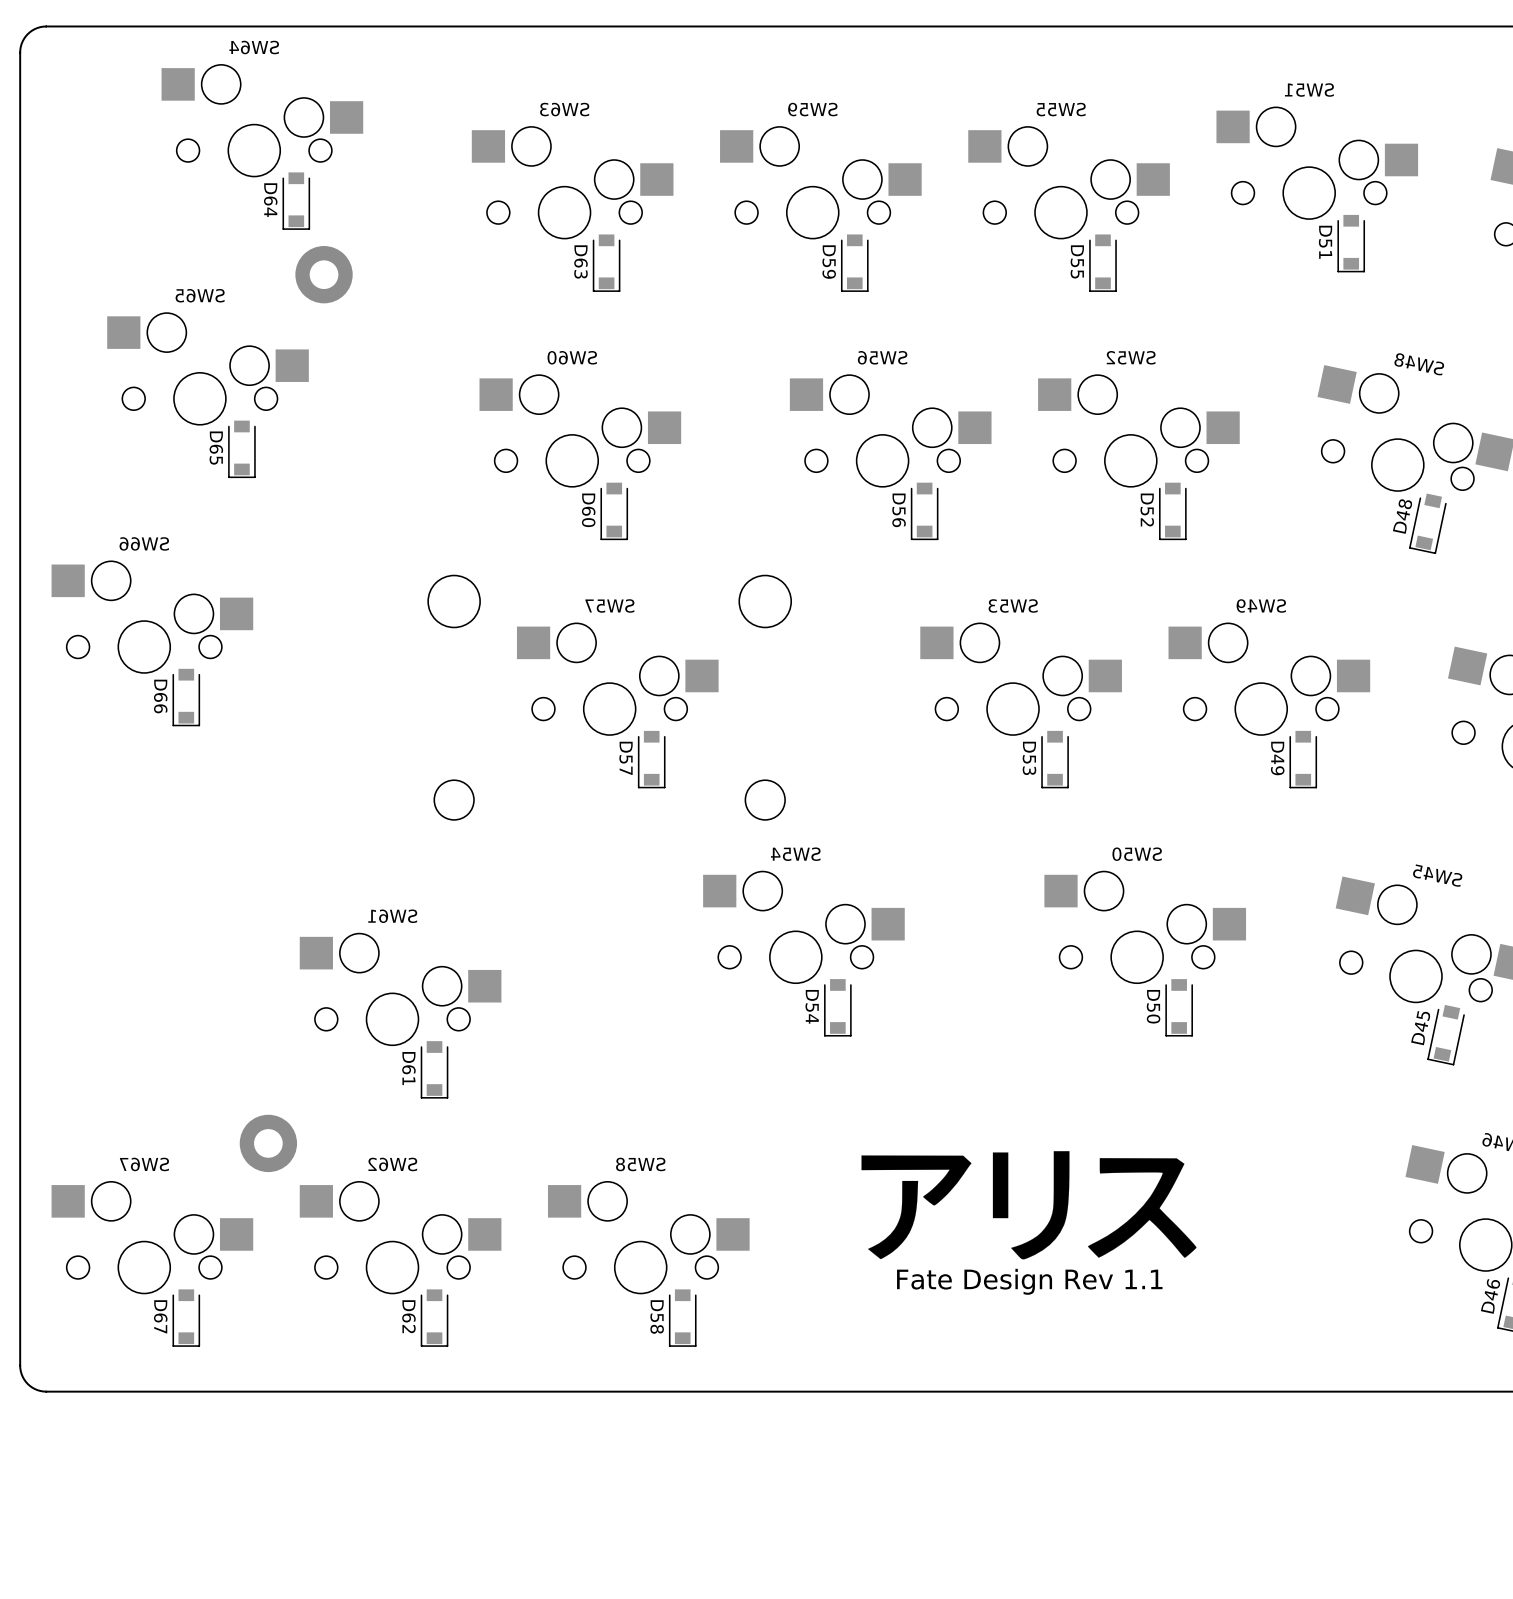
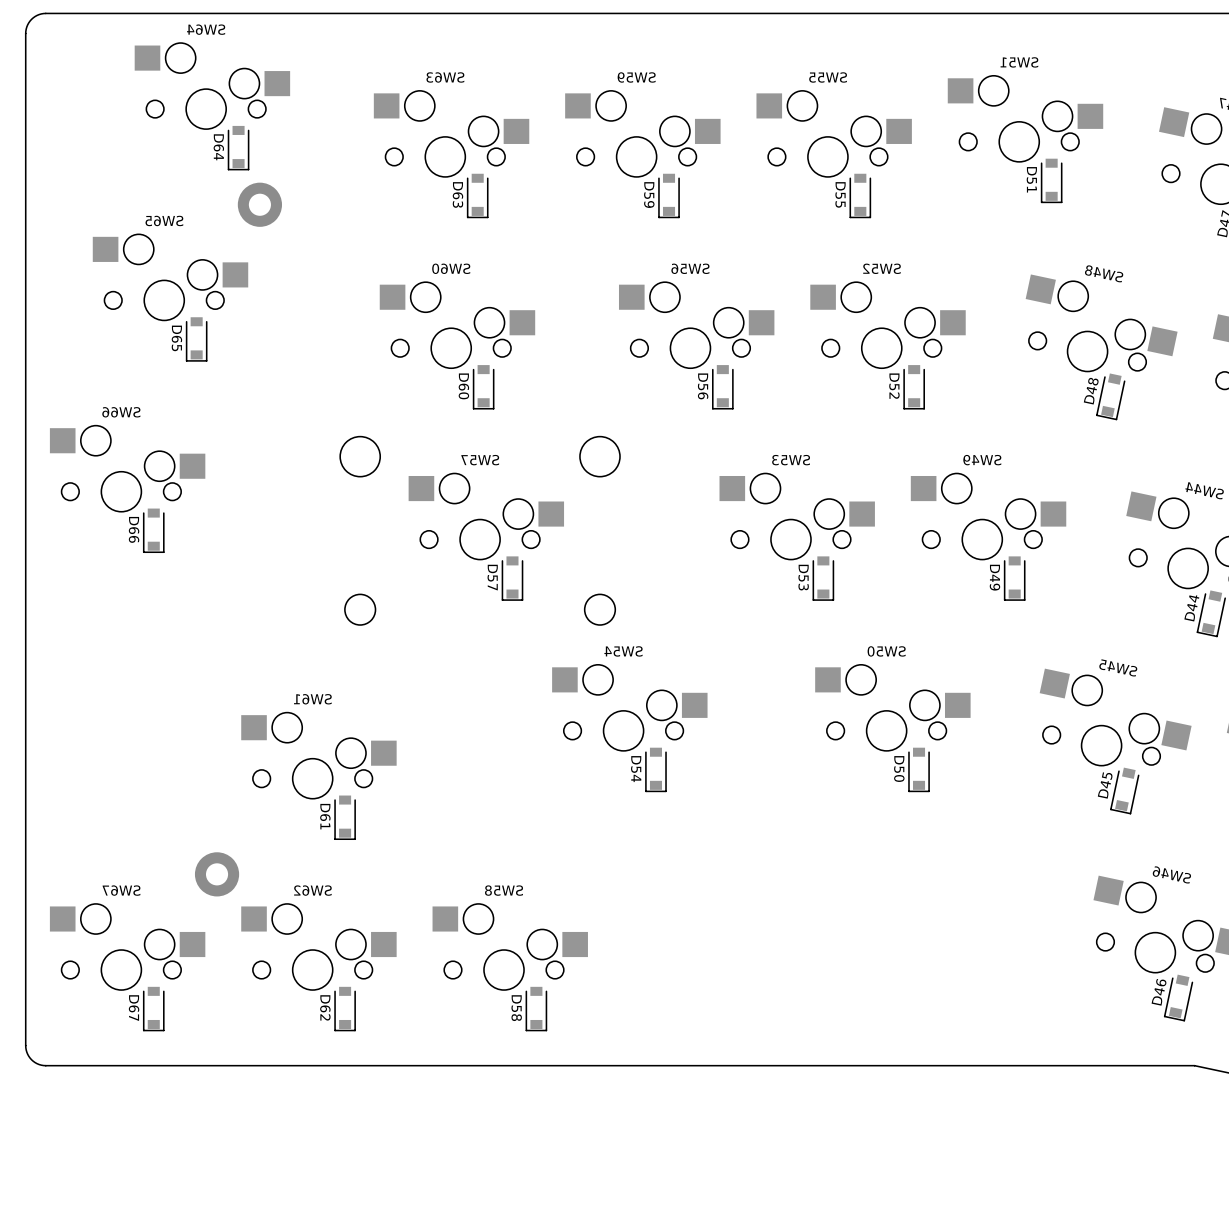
drawing: [861, 1151, 1197, 1260] -> none
text: Fate Design Rev 1.1 (1029, 1281) -> none

